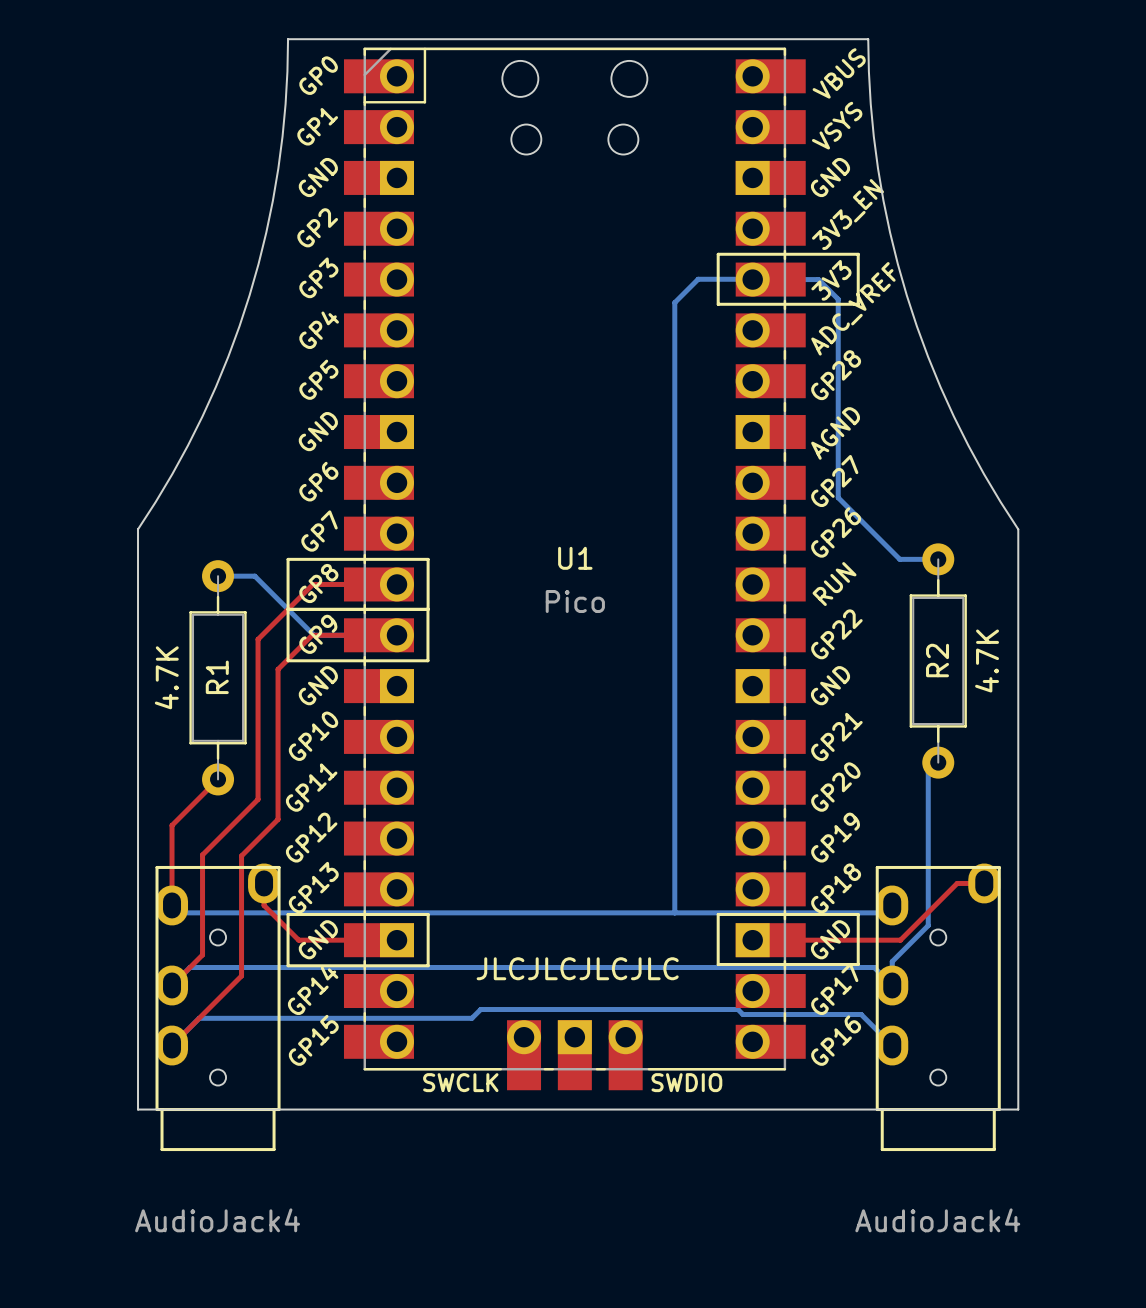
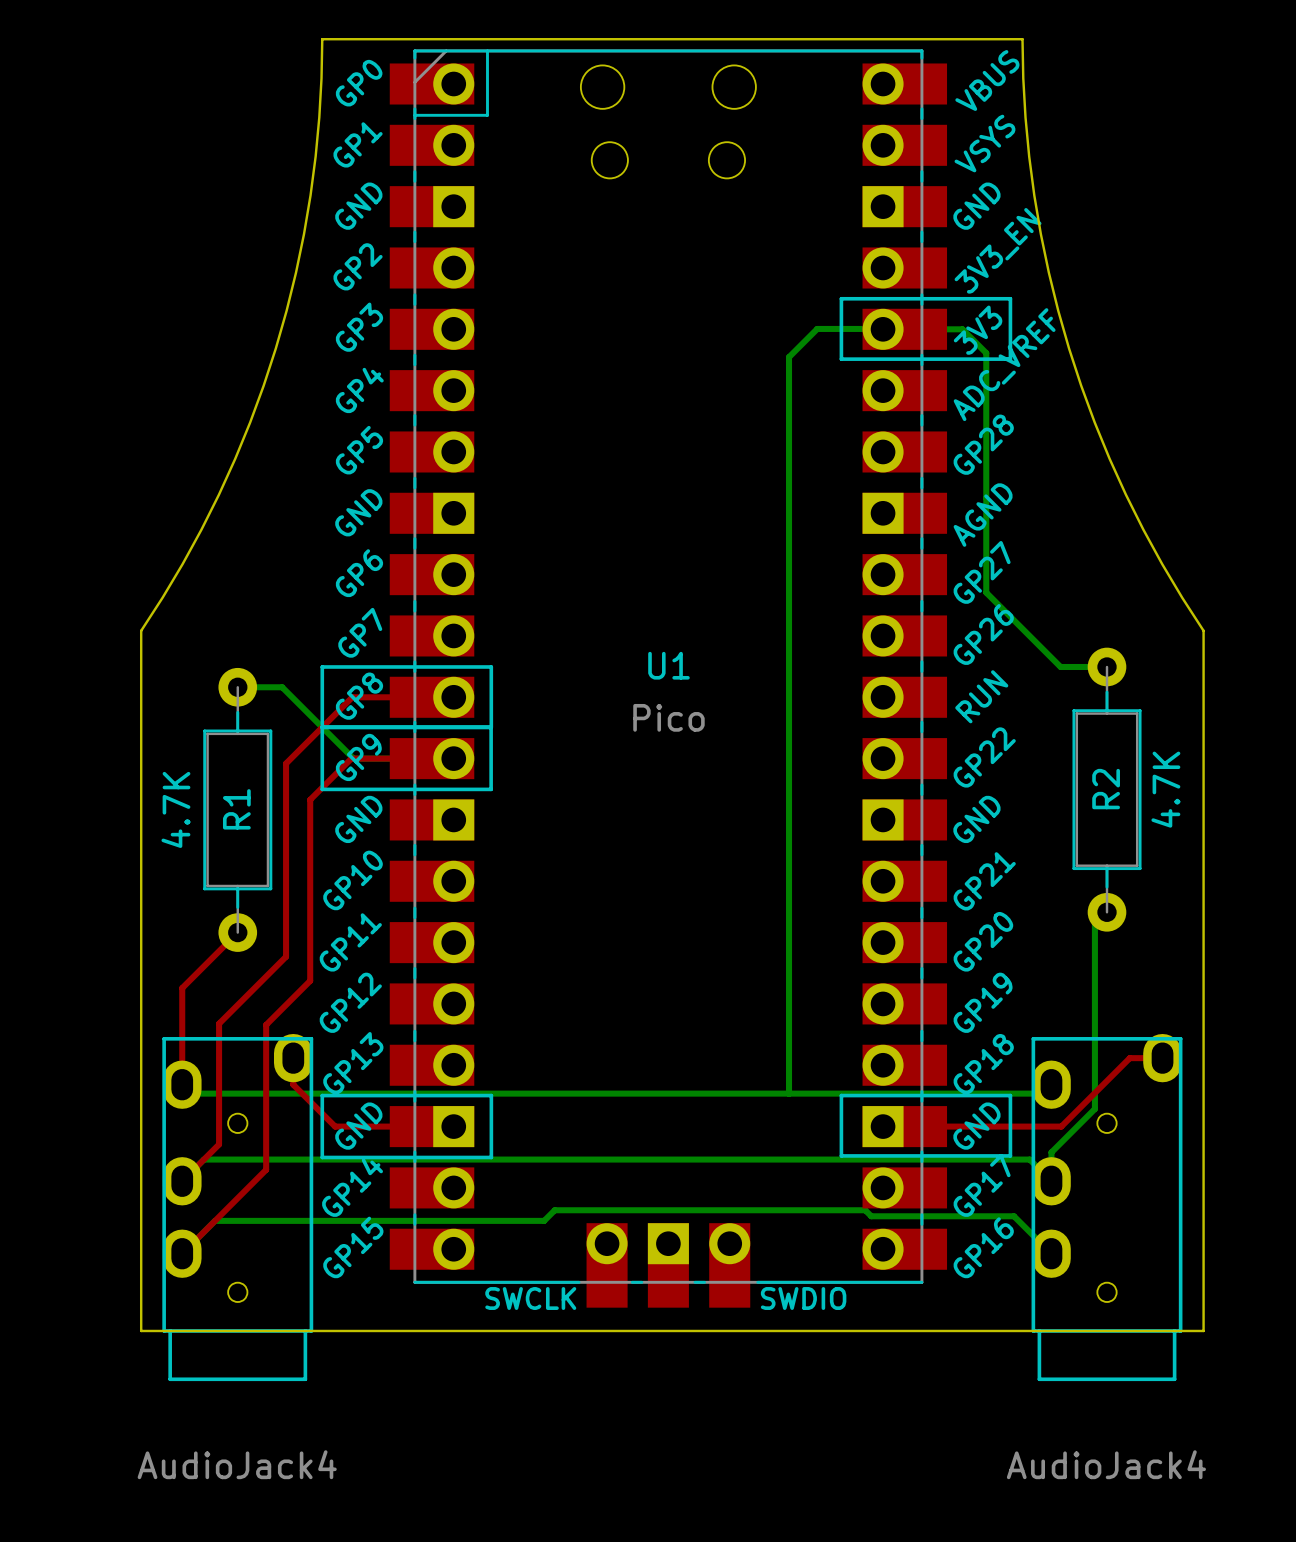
text: JLCJLCJLCJLC (577, 968) -> none

